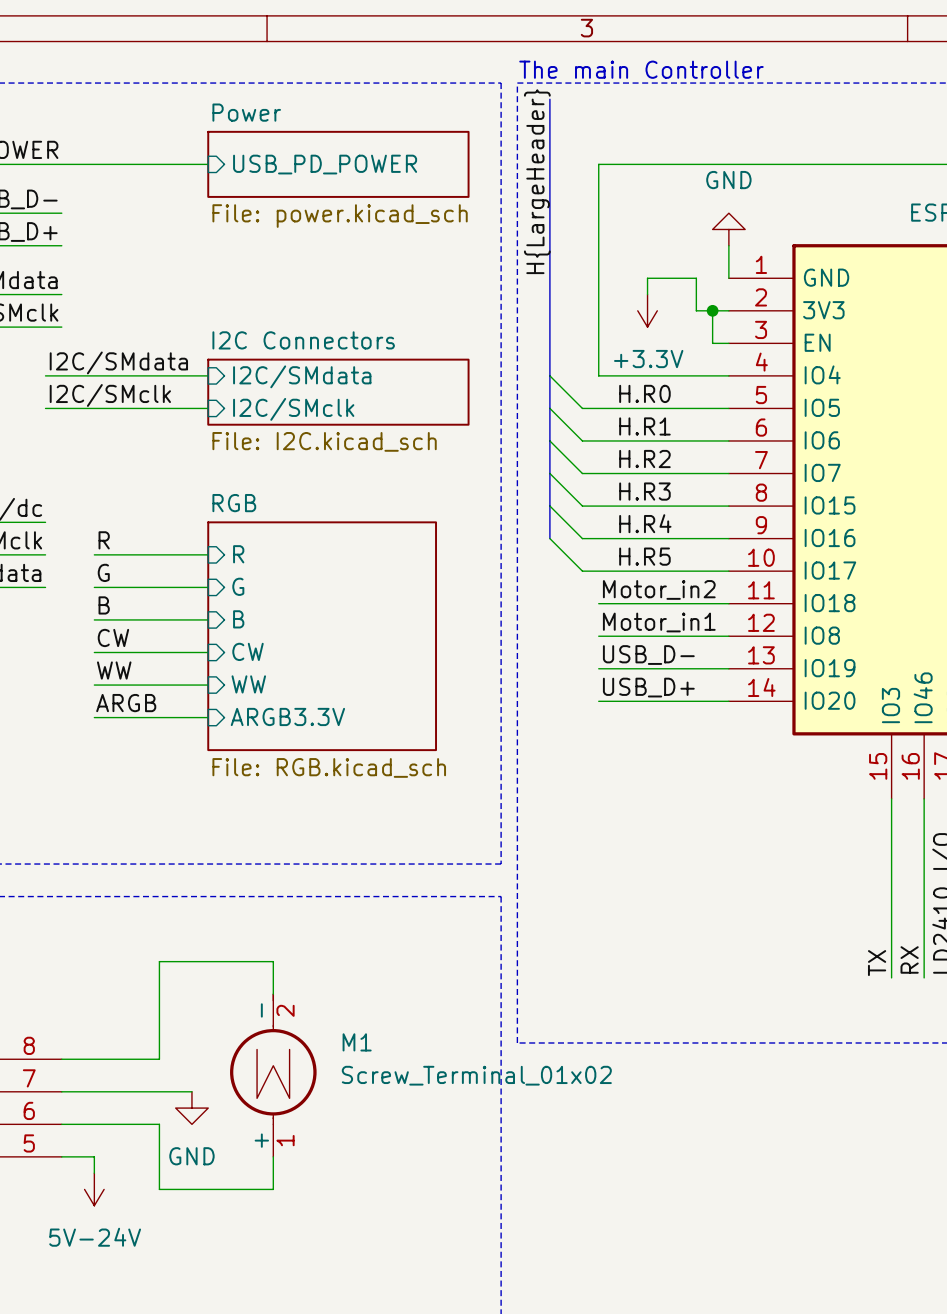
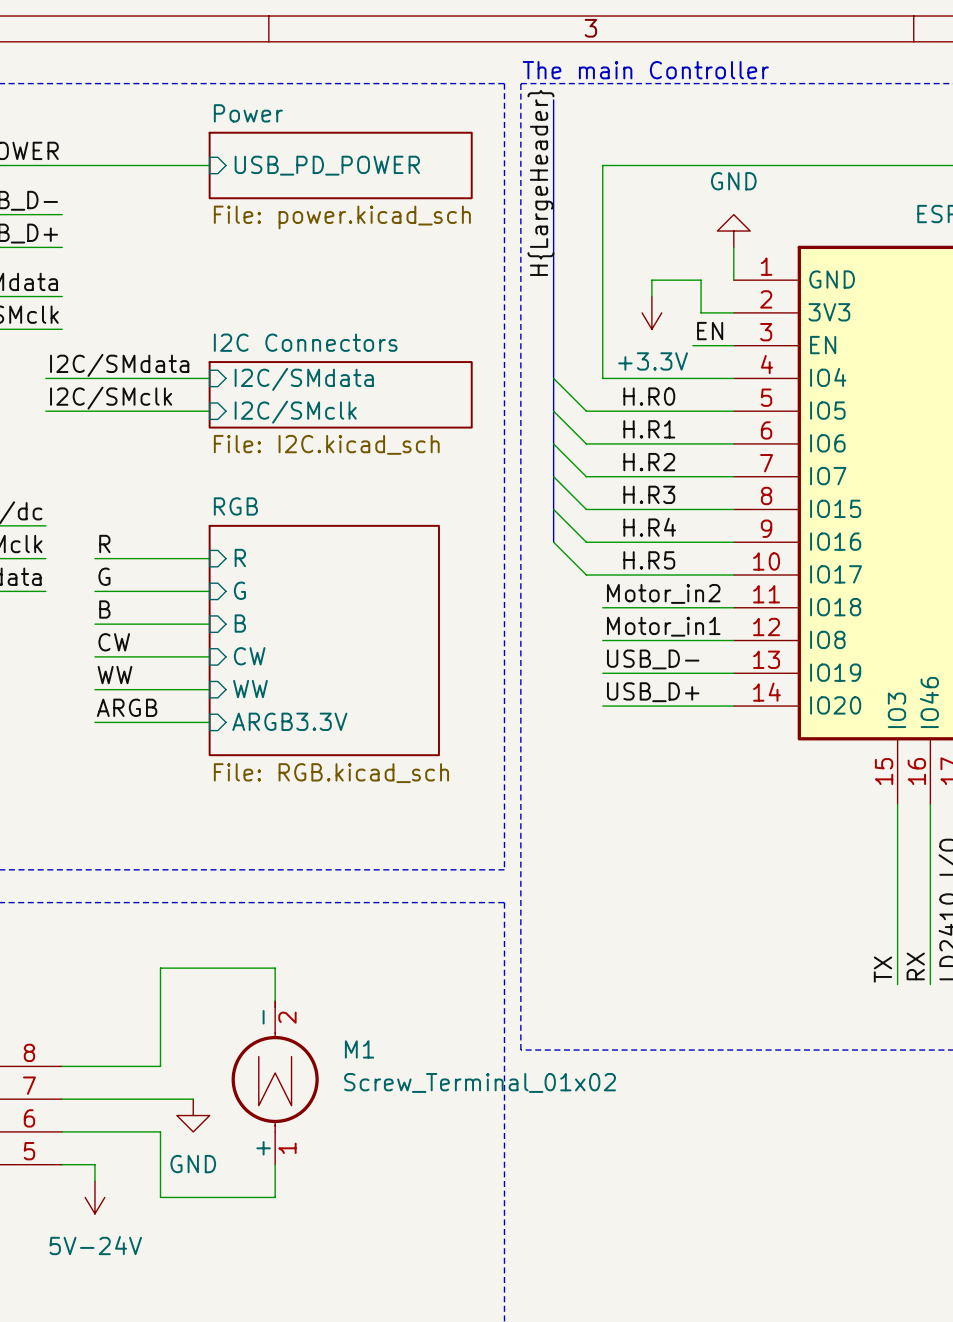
wire: (712, 310) (712, 343) -> (692, 345) (717, 345)
junction: (712, 310) -> none
label: none -> EN (710, 331)

